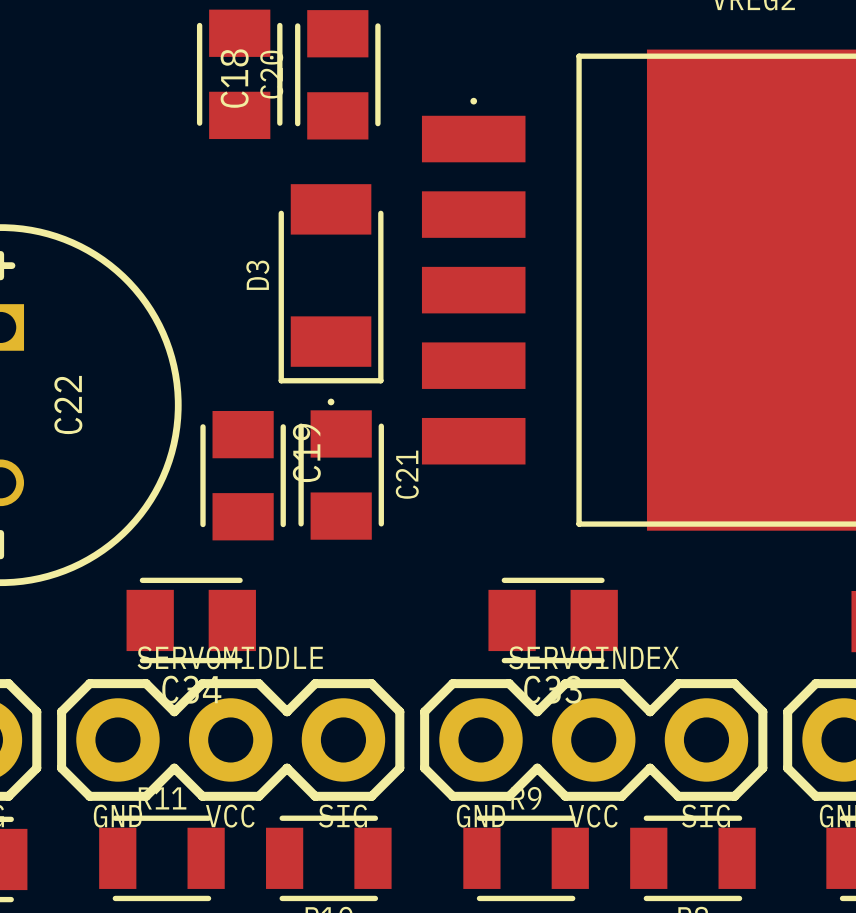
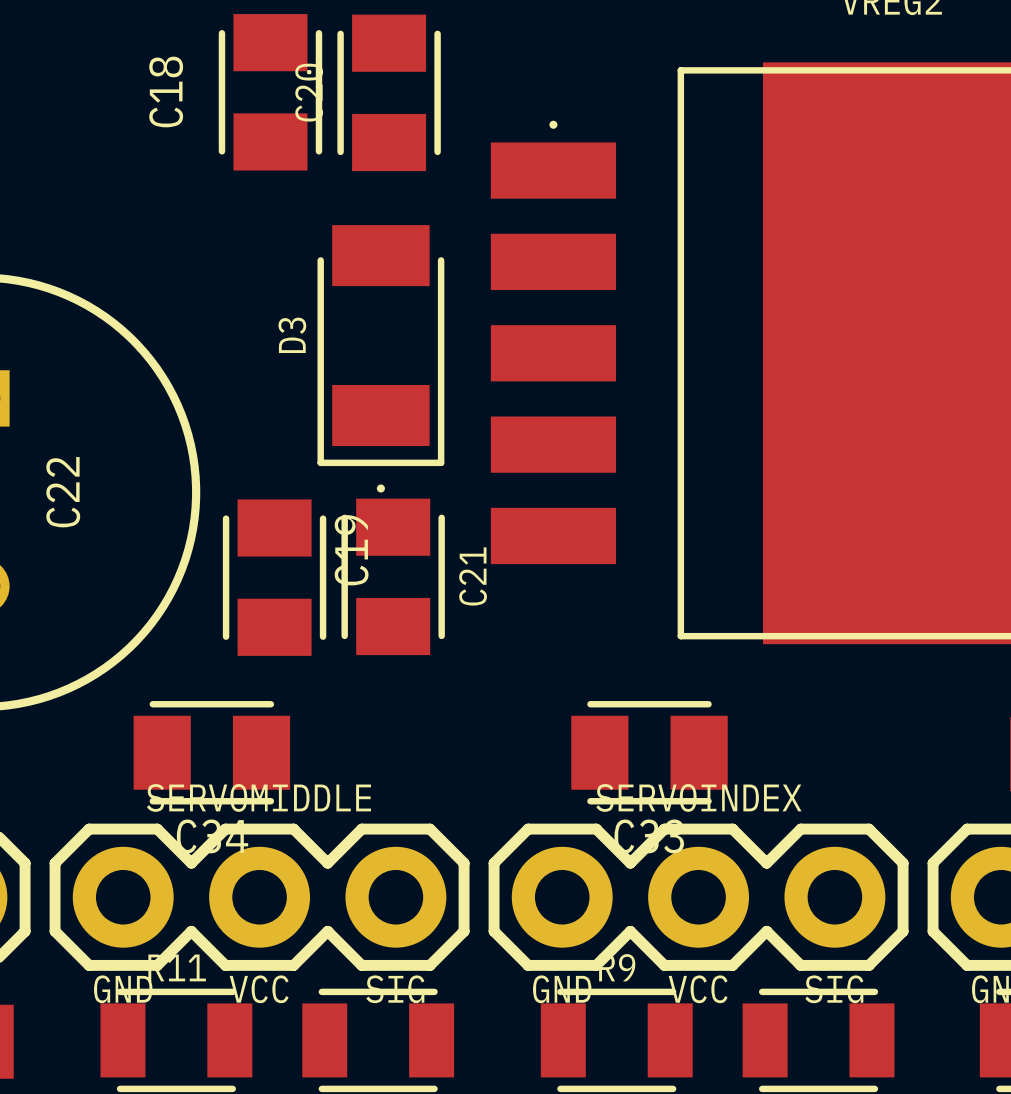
C18 name position: C18 (234, 78) -> C18 (166, 91)

